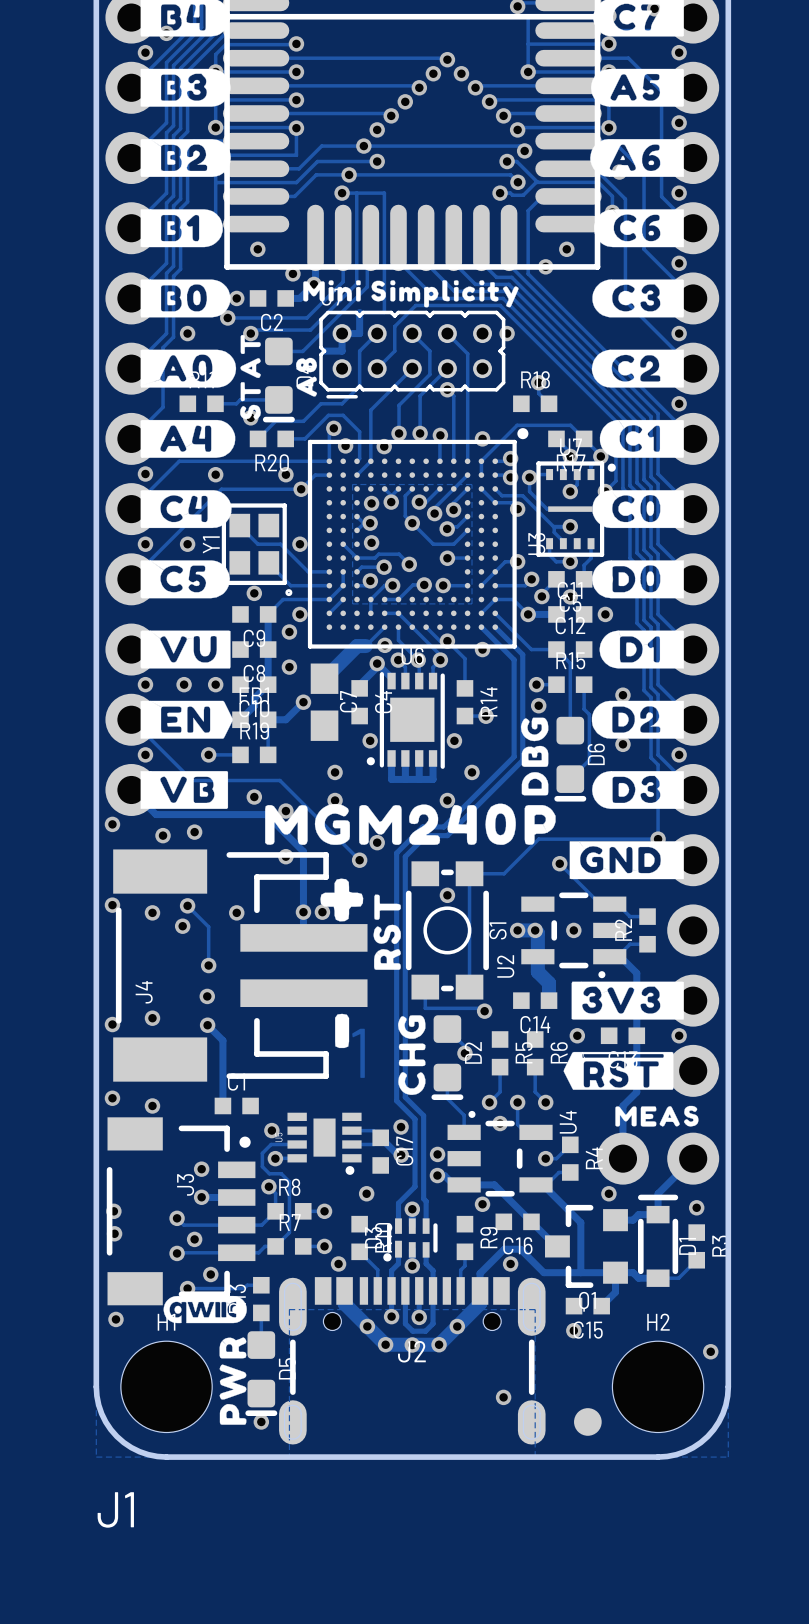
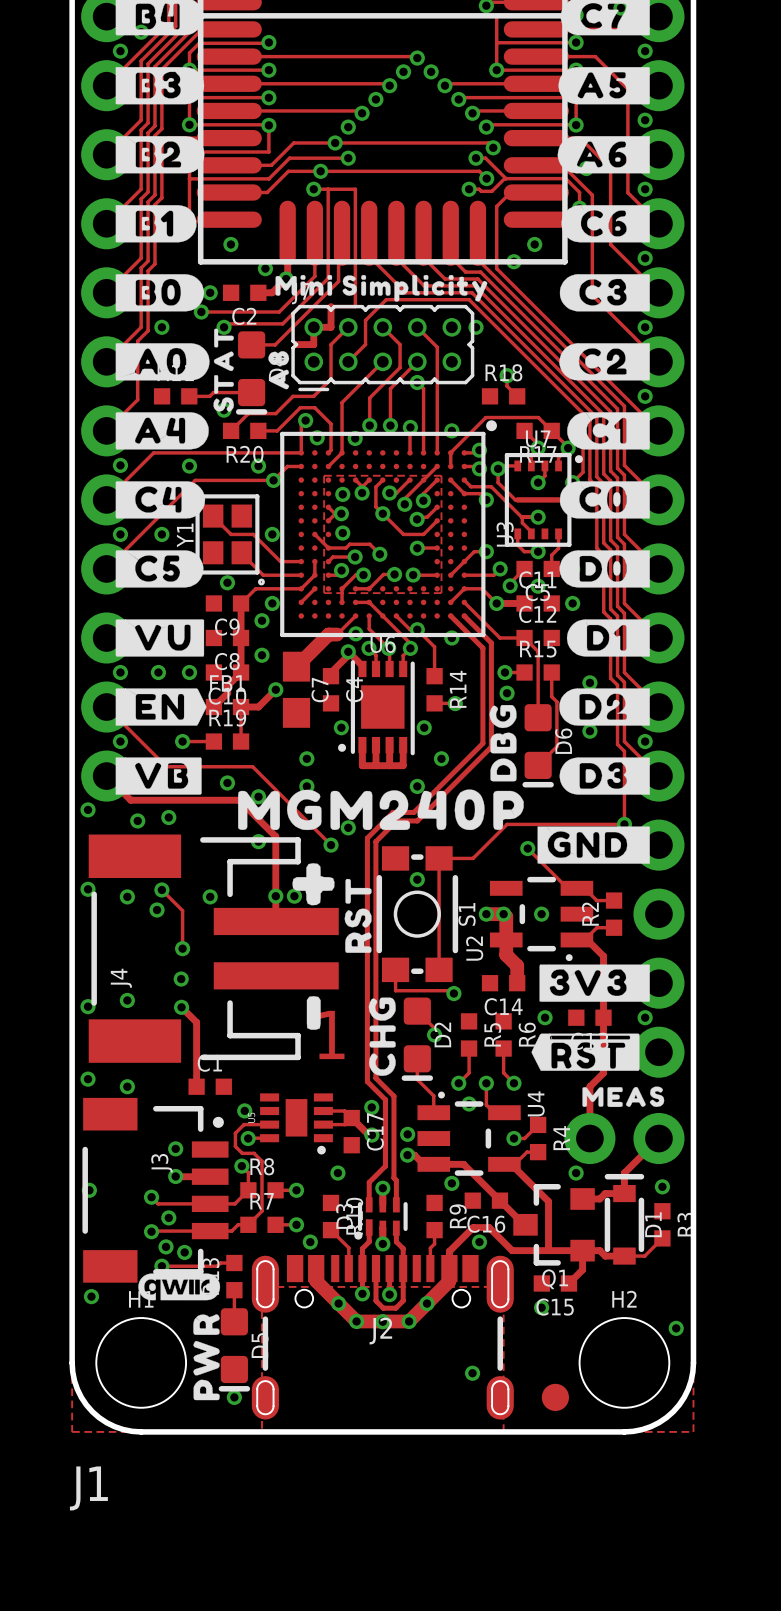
via position: (114, 1233) -> (166, 1246)

